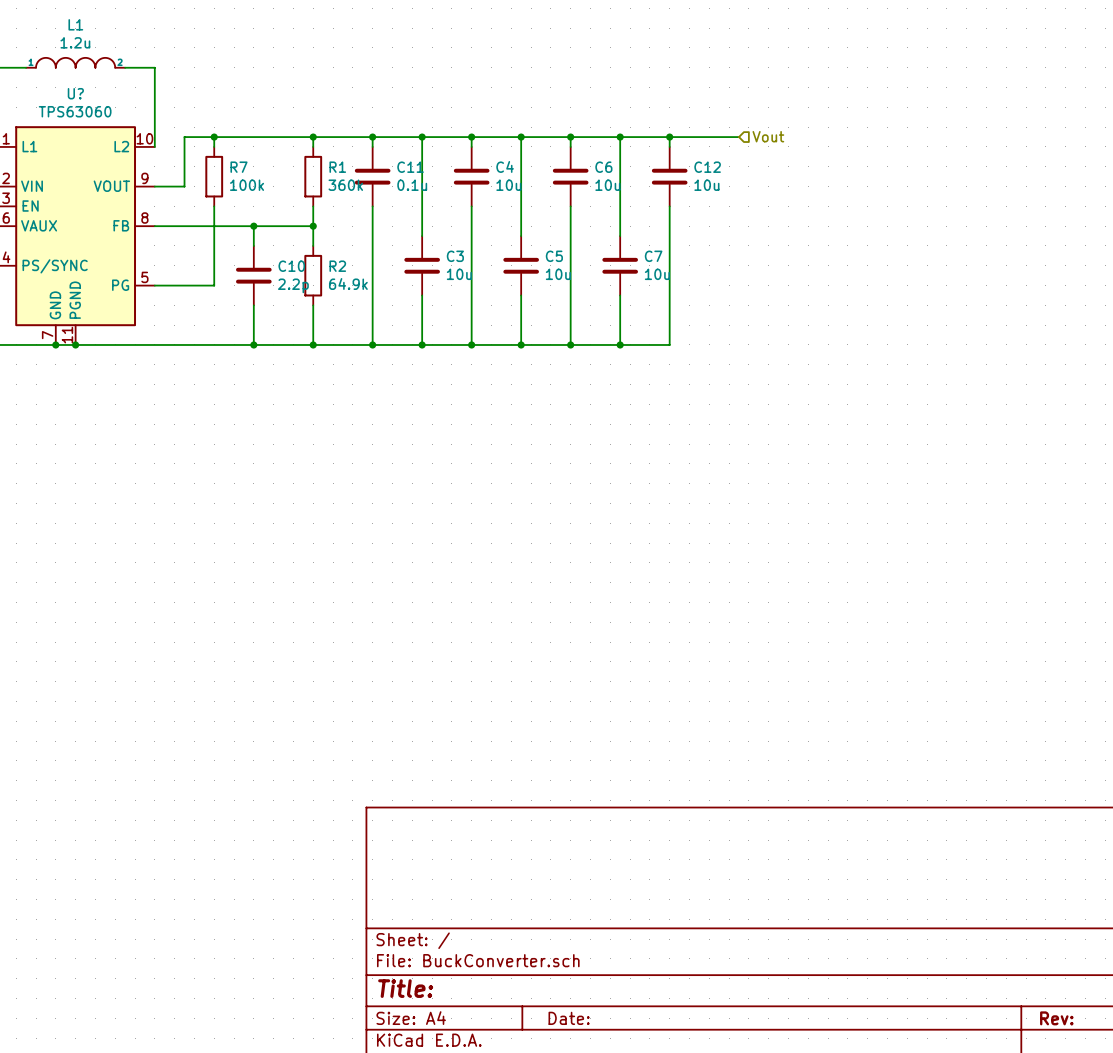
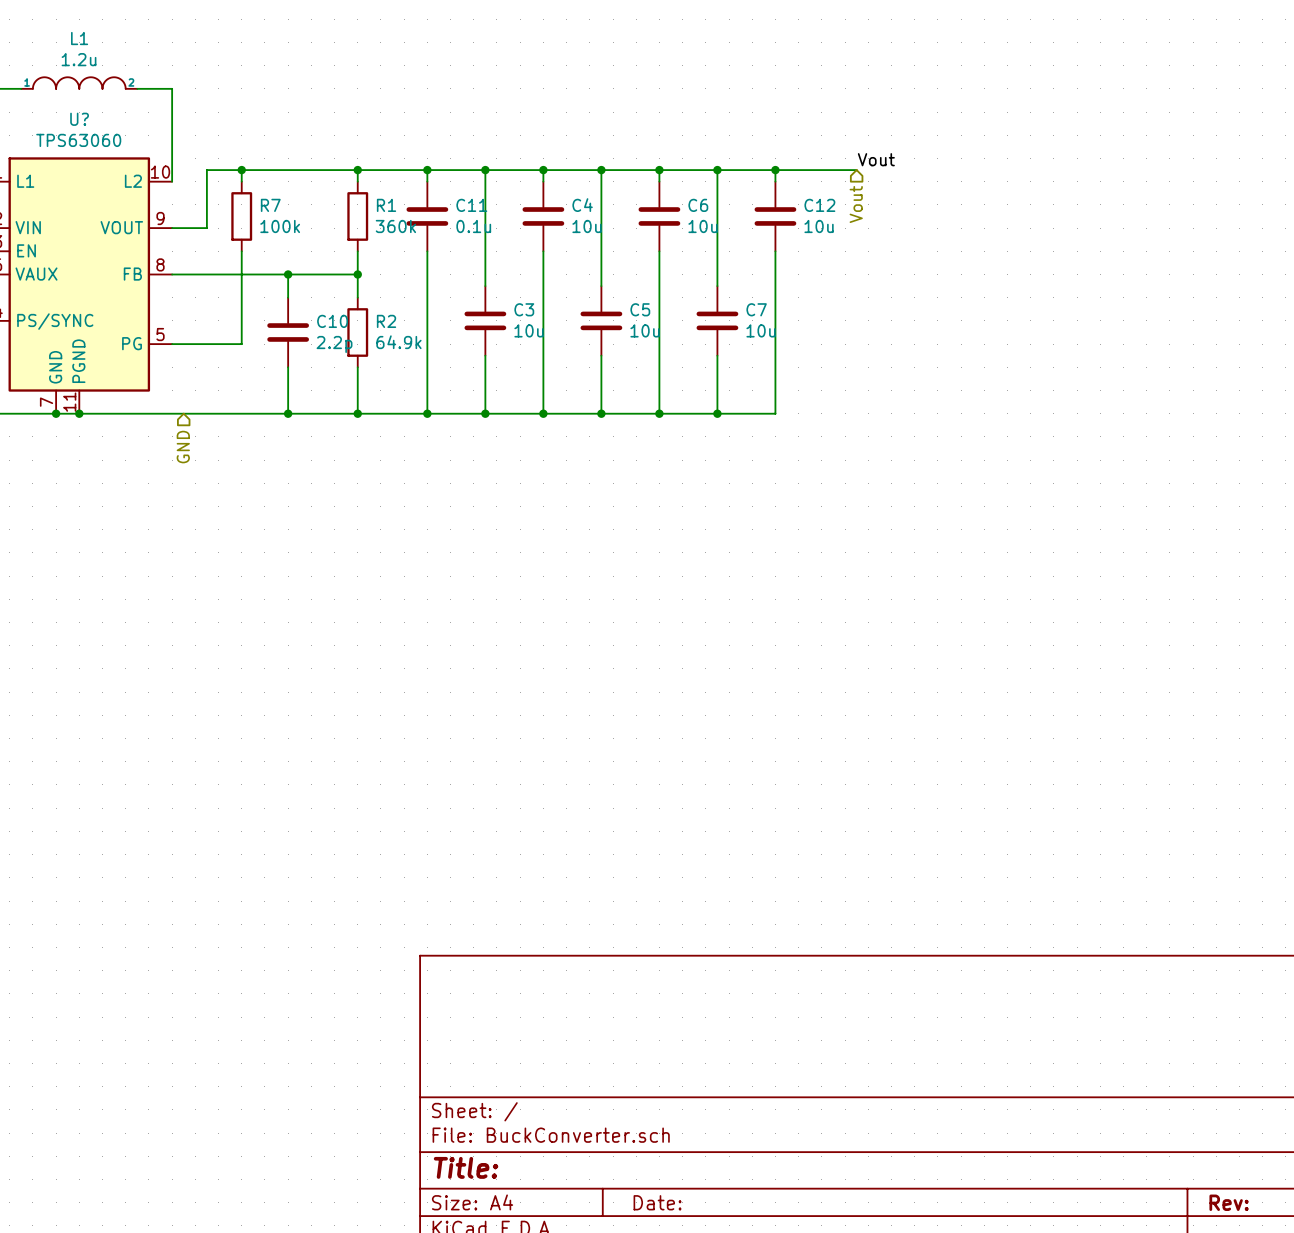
label: none -> Vout (876, 159)
hierarchical label rotation: 0° (768, 136) -> 90° clockwise (856, 204)
hierarchical label position: Vout (768, 136) -> Vout (856, 204)
hierarchical label: none -> GND (183, 447)

